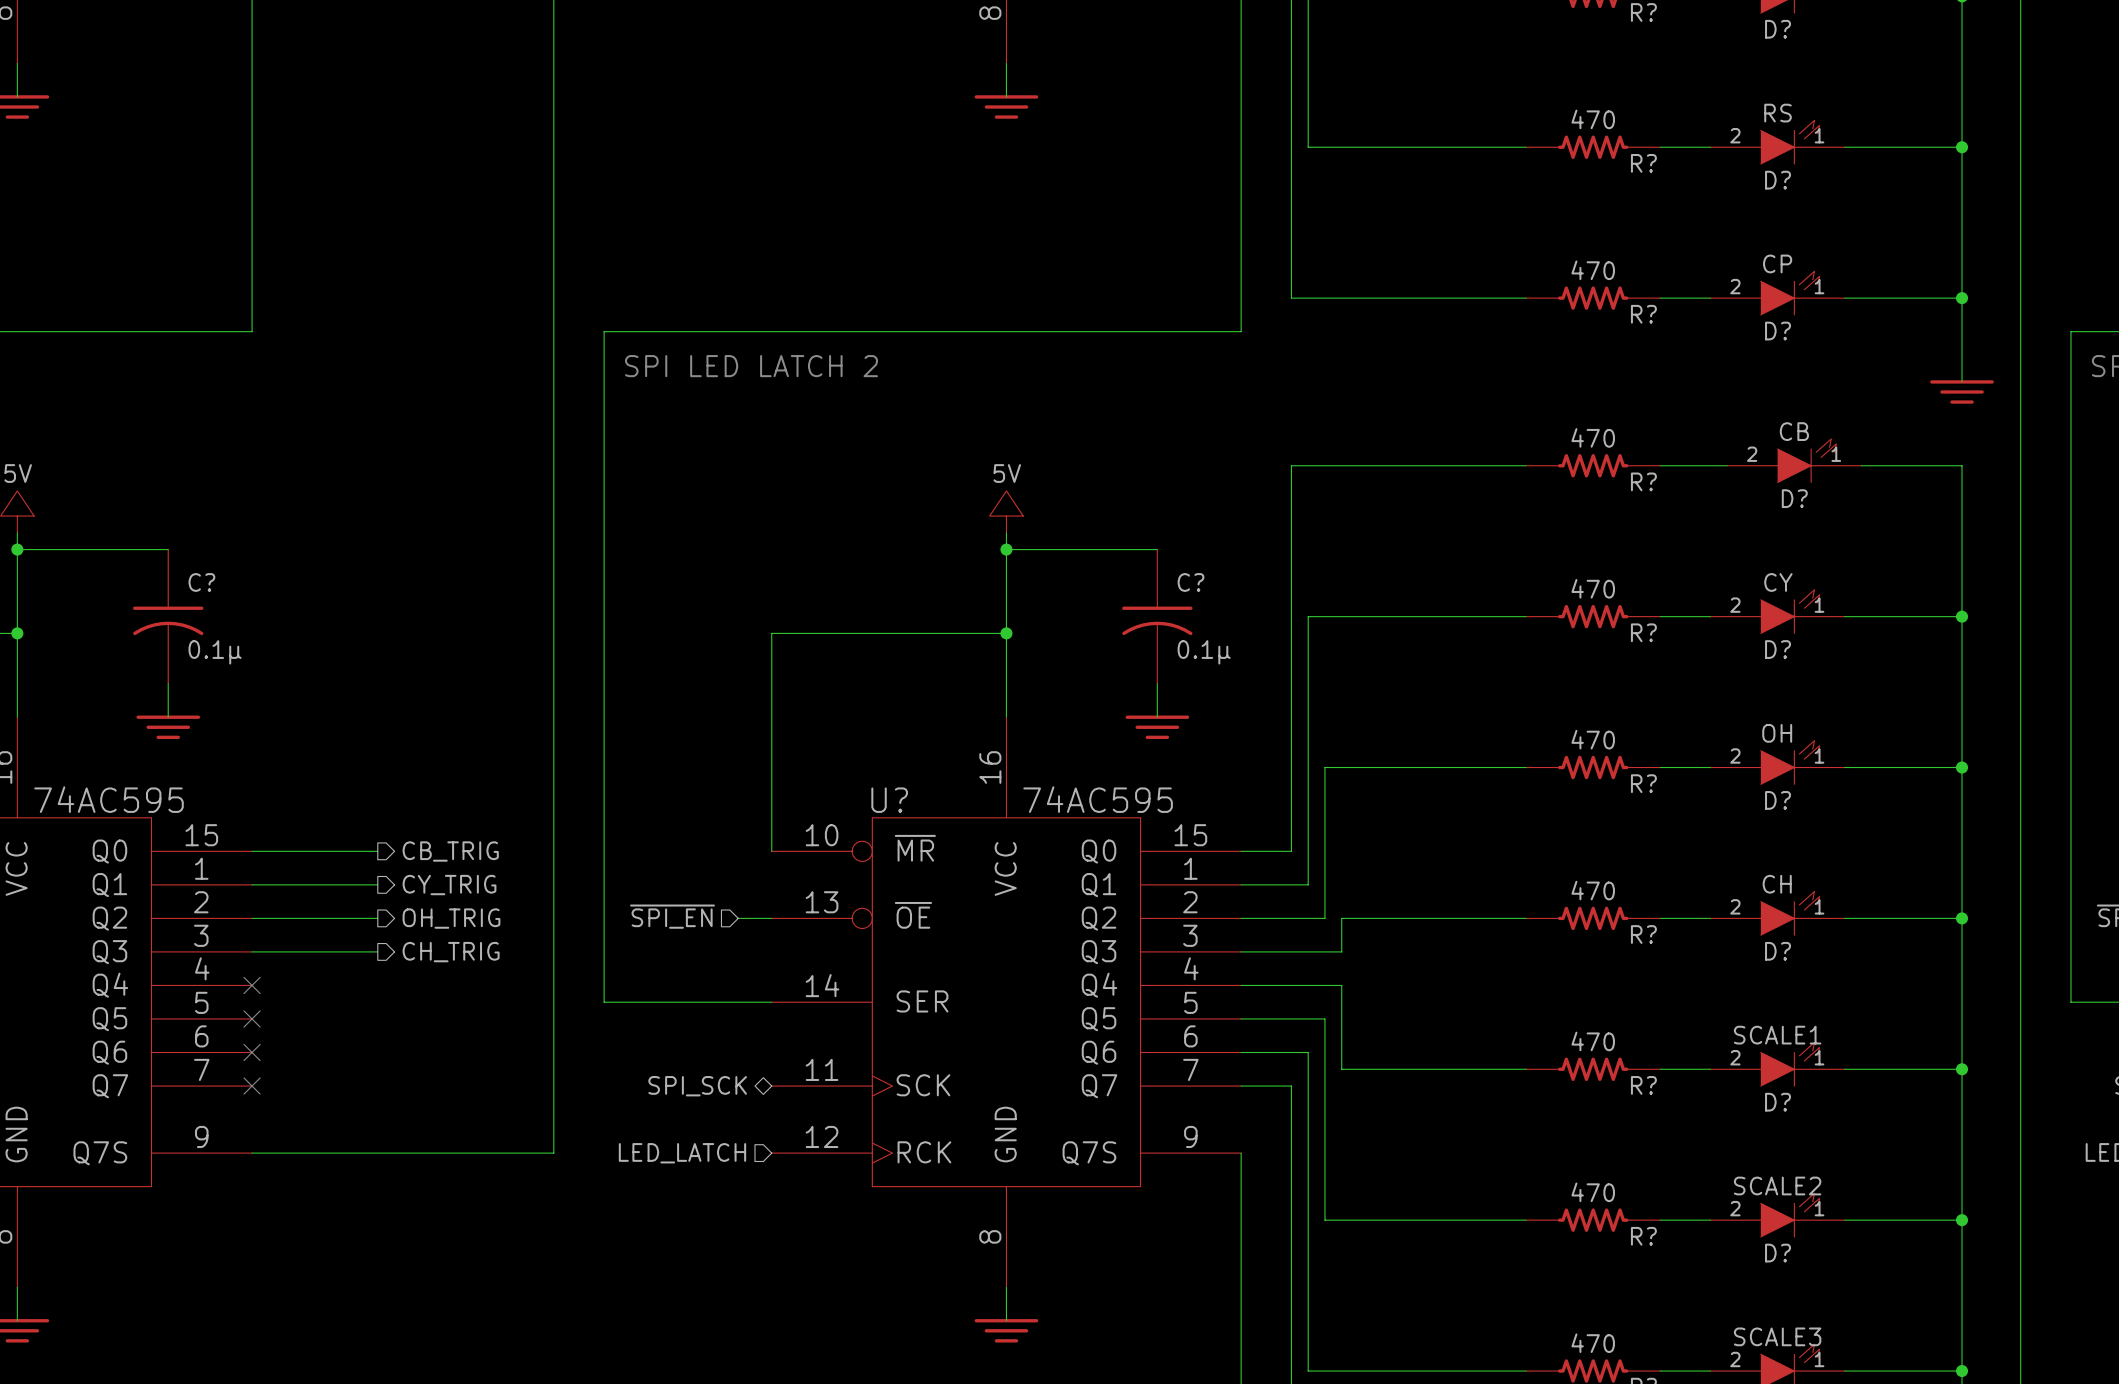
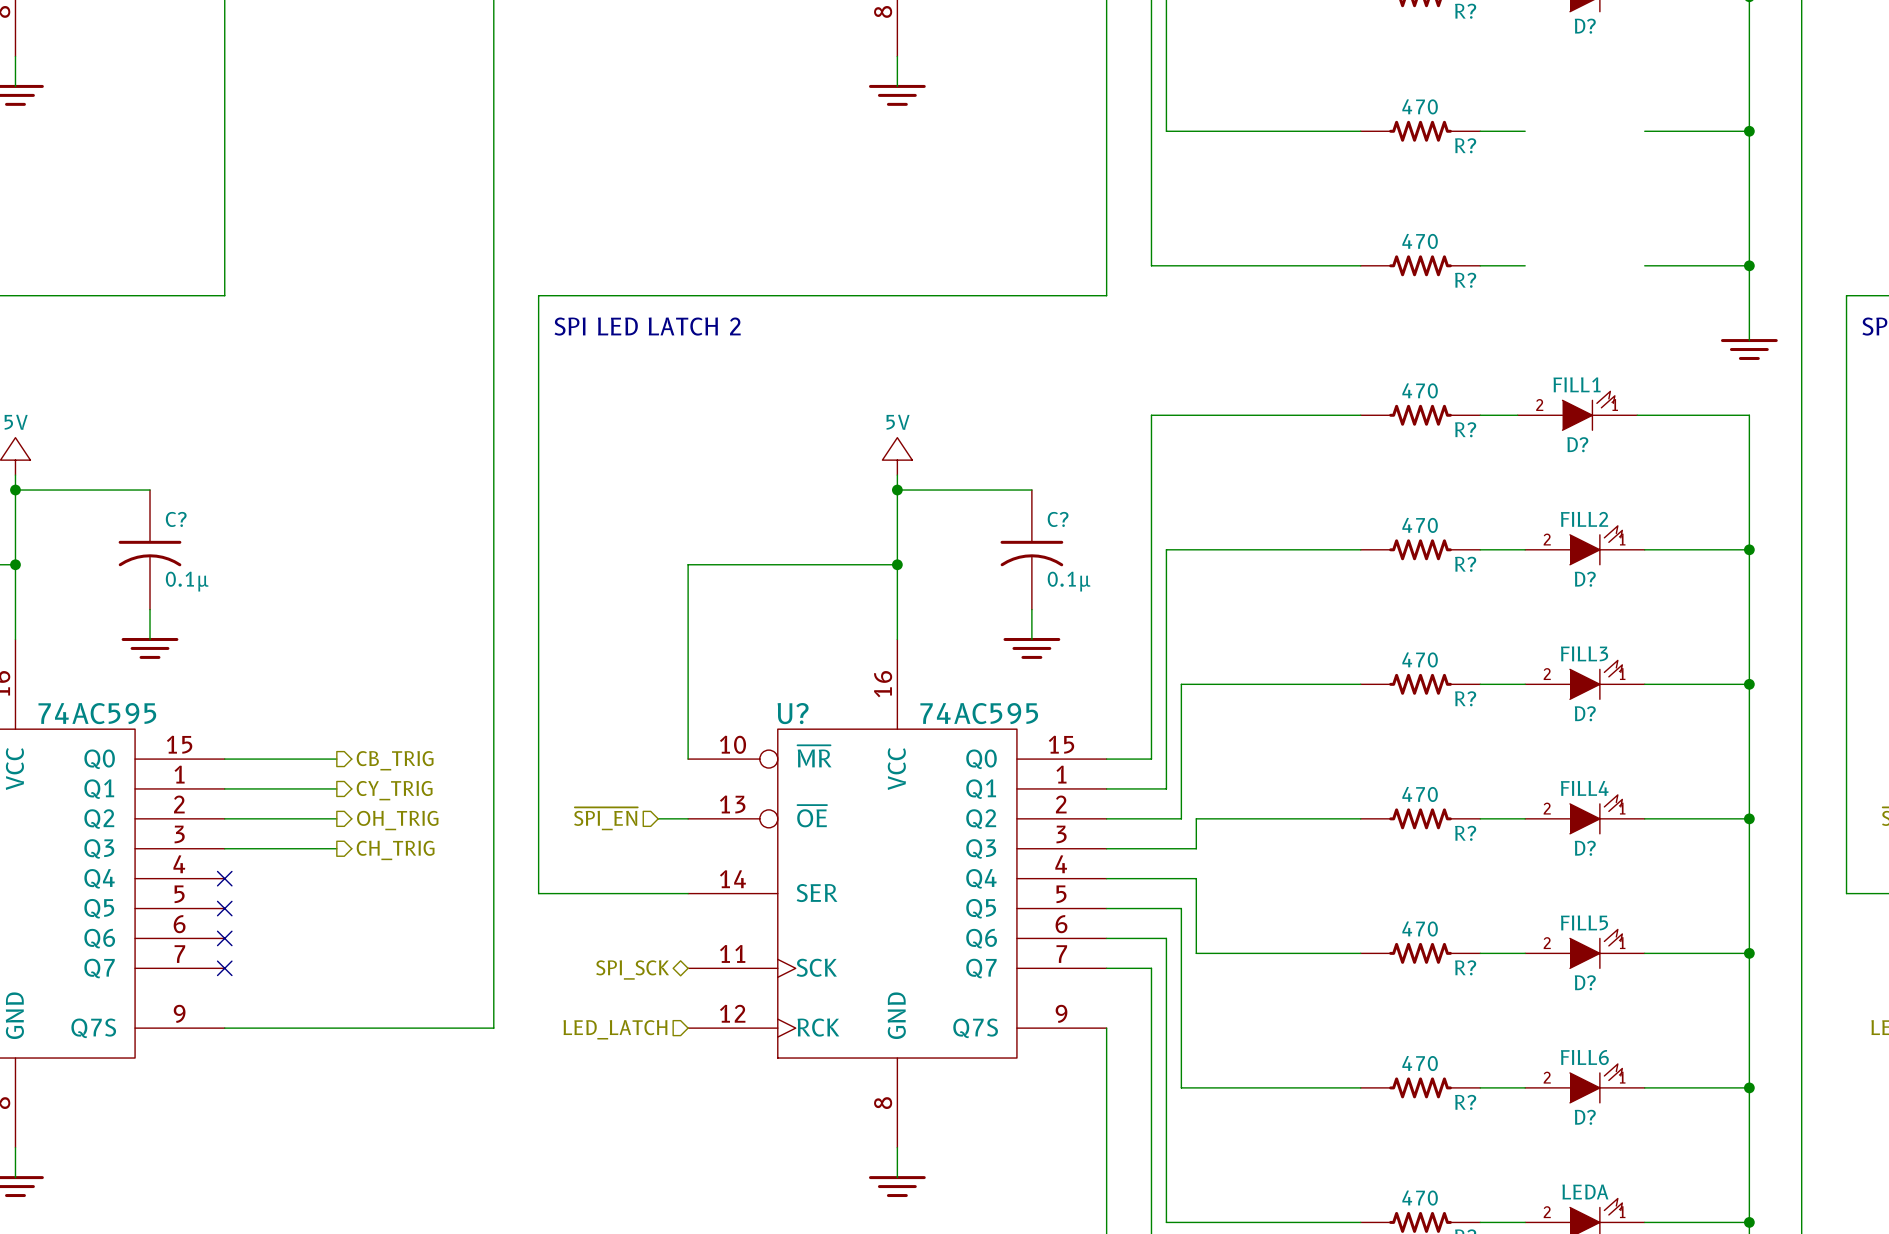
D?: RS (1777, 142) -> none
D?: CP (1777, 293) -> none
D?: none -> FILL1 (1577, 410)
D?: CB (1794, 460) -> none
D? value: CY (1778, 582) -> FILL2 (1584, 519)
D? value: OH (1777, 733) -> FILL3 (1584, 653)
D? value: CH (1777, 884) -> FILL4 (1584, 788)
D? value: SCALE1 (1777, 1035) -> FILL5 (1584, 922)
D? value: SCALE2 (1777, 1185) -> FILL6 (1584, 1057)
part value: SCALE3 (1777, 1336) -> LEDA (1585, 1191)

